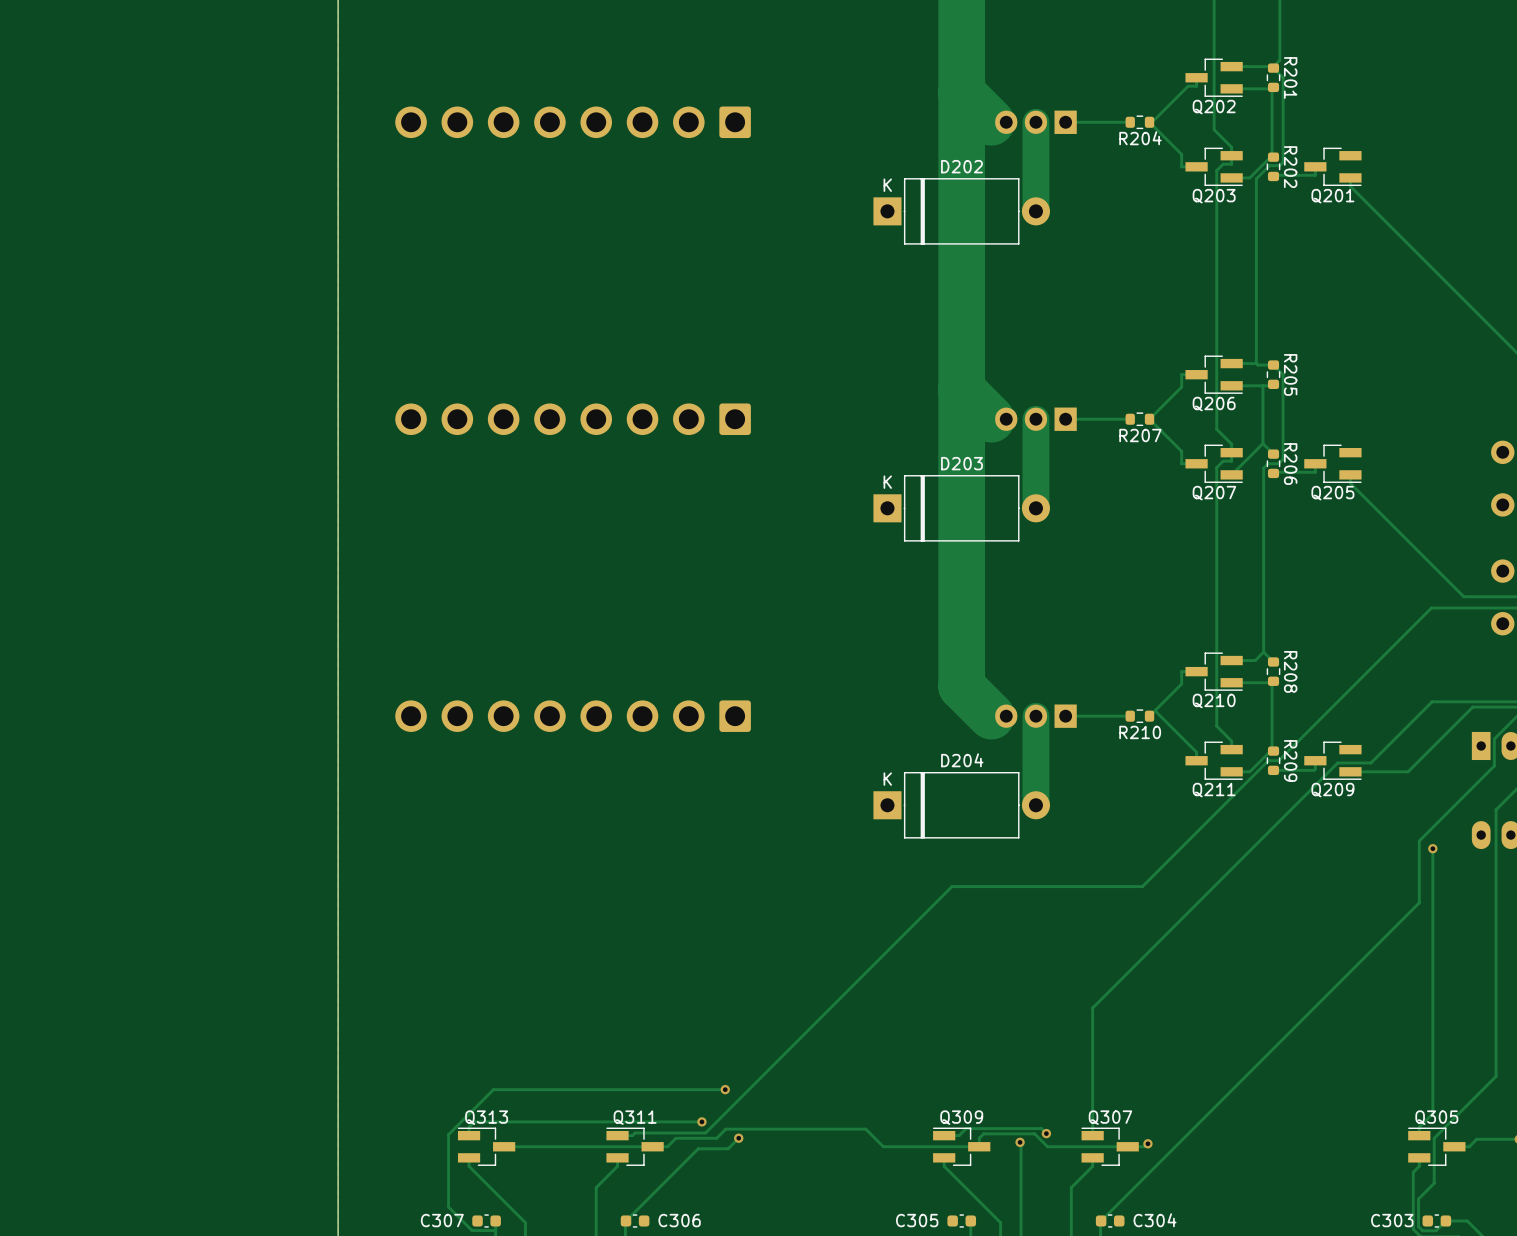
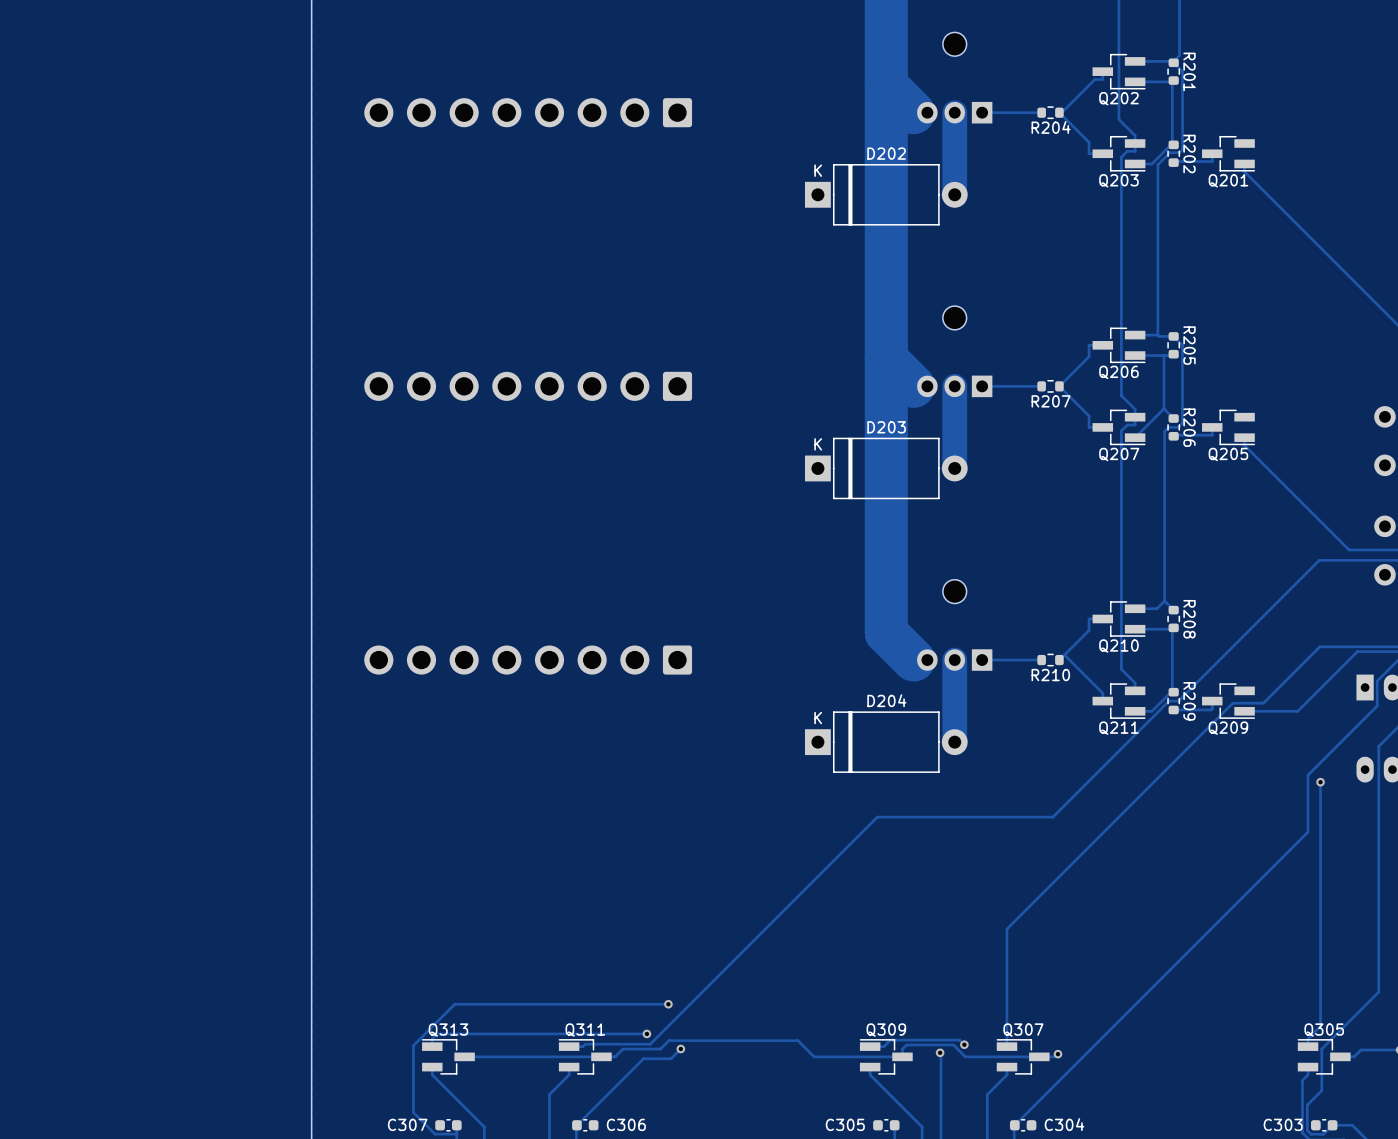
part: none -> (954, 44)
part: none -> (954, 317)
part: none -> (954, 591)

